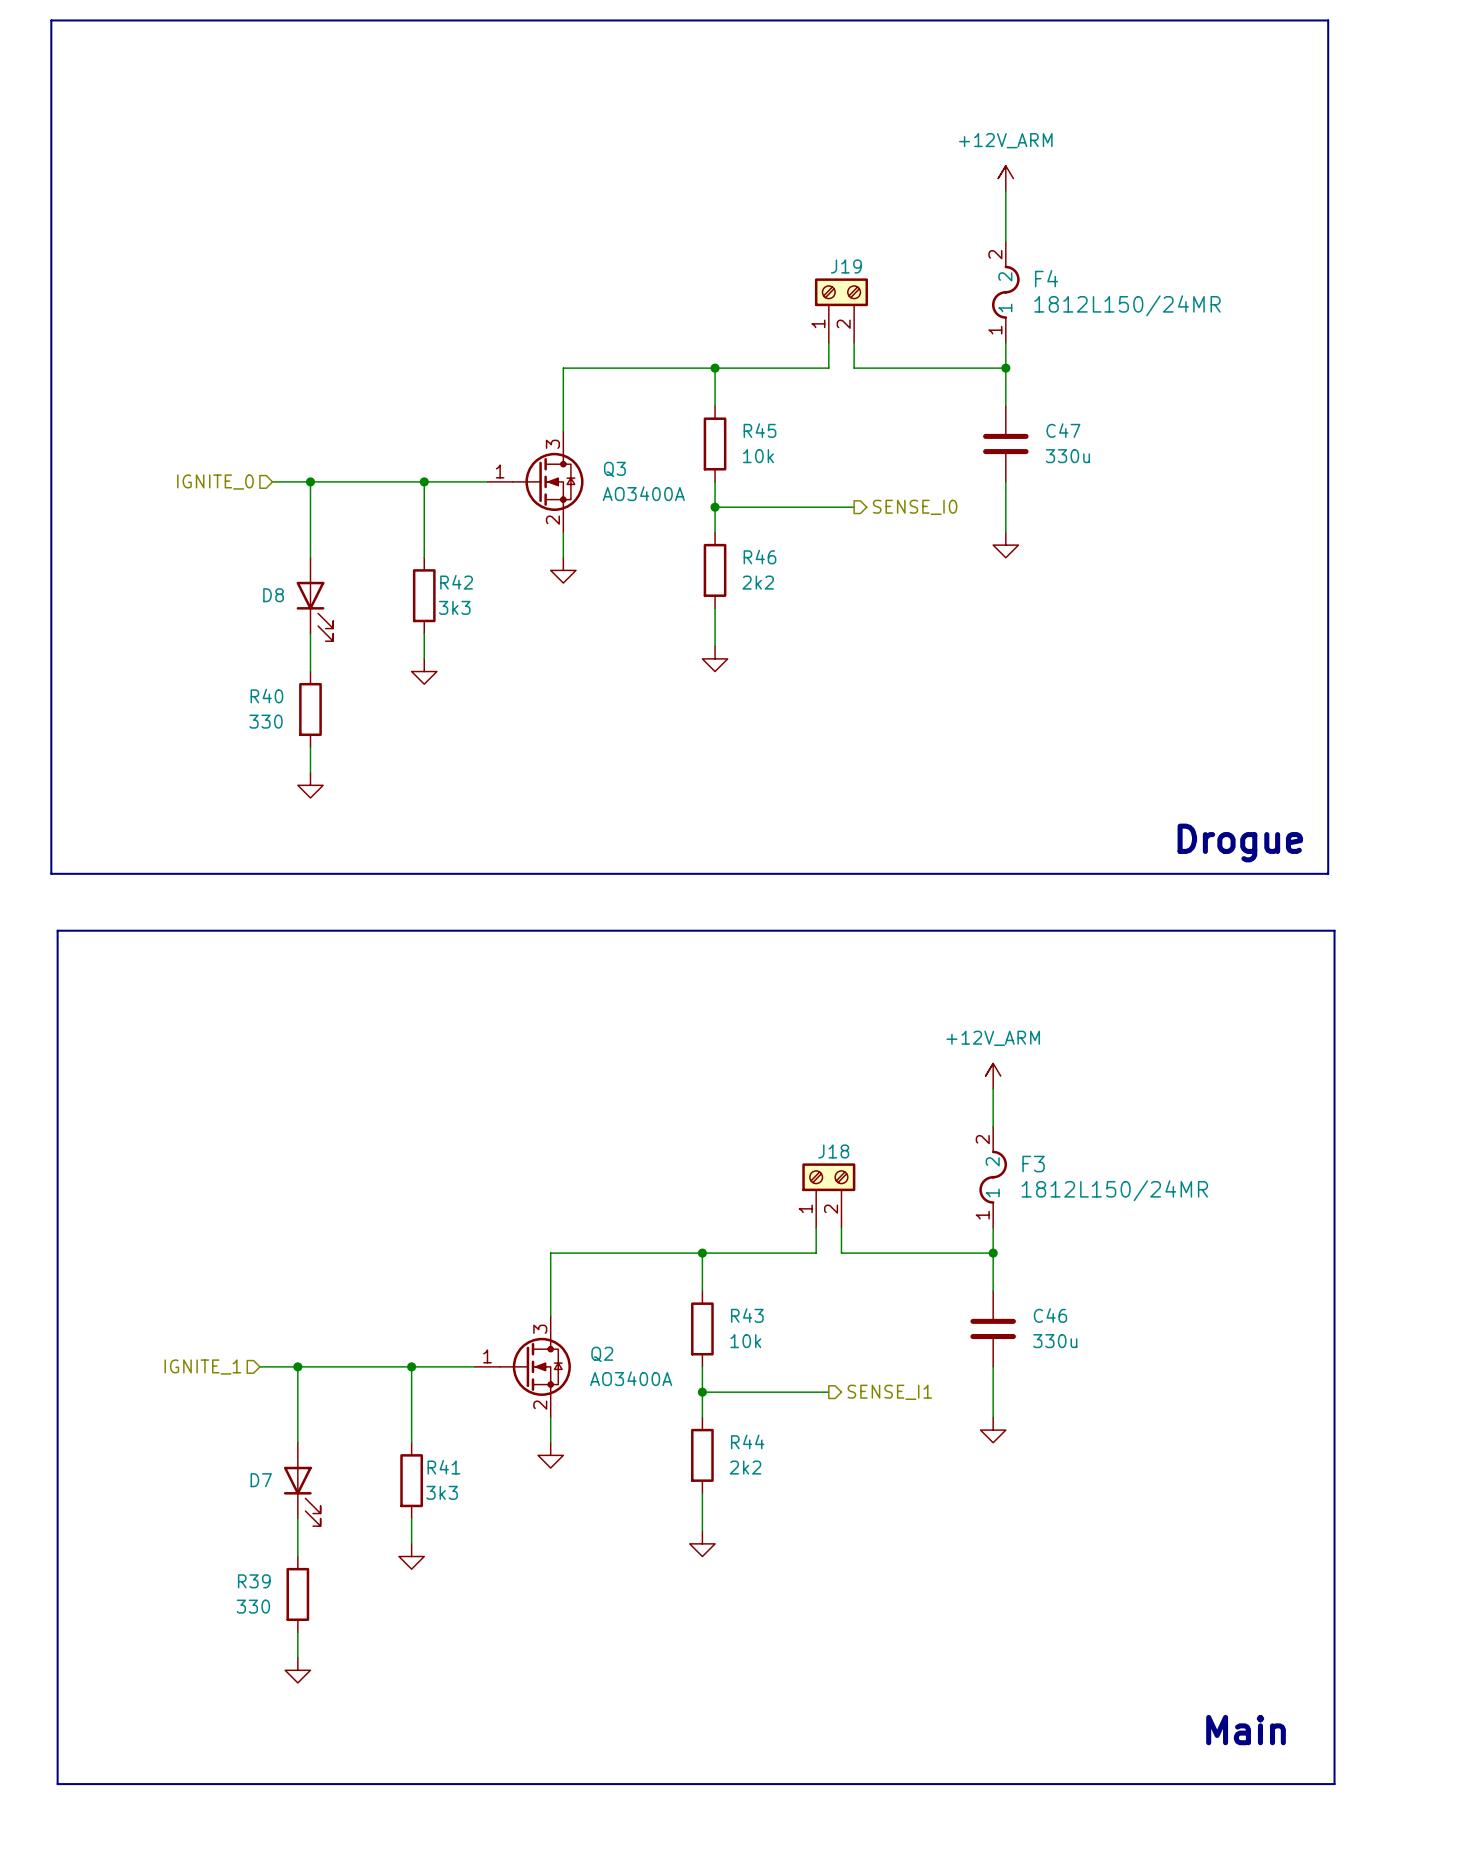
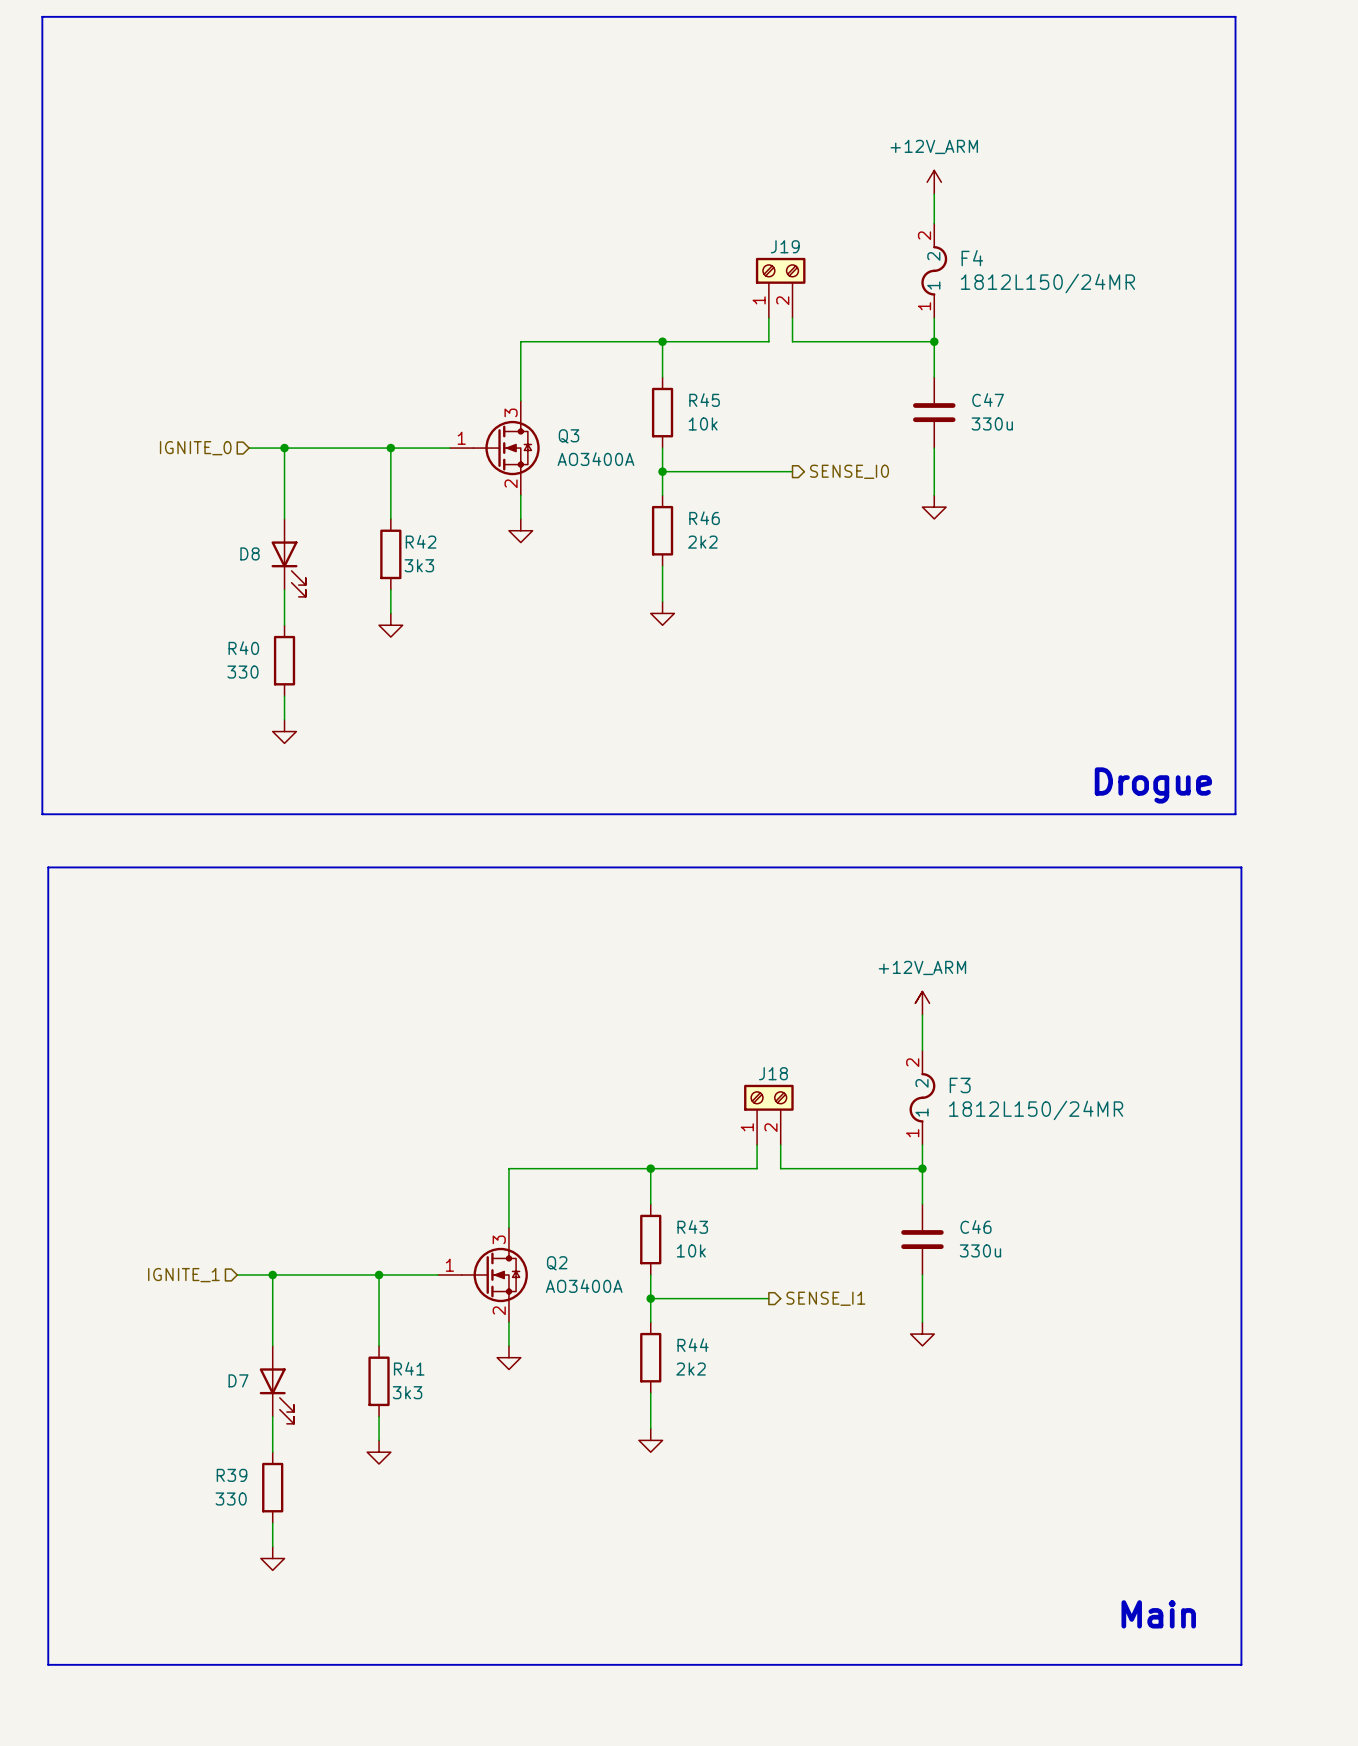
power symbol: +12V_ARM (1005, 178) -> none
power symbol: none -> +12V_ARM (934, 182)

